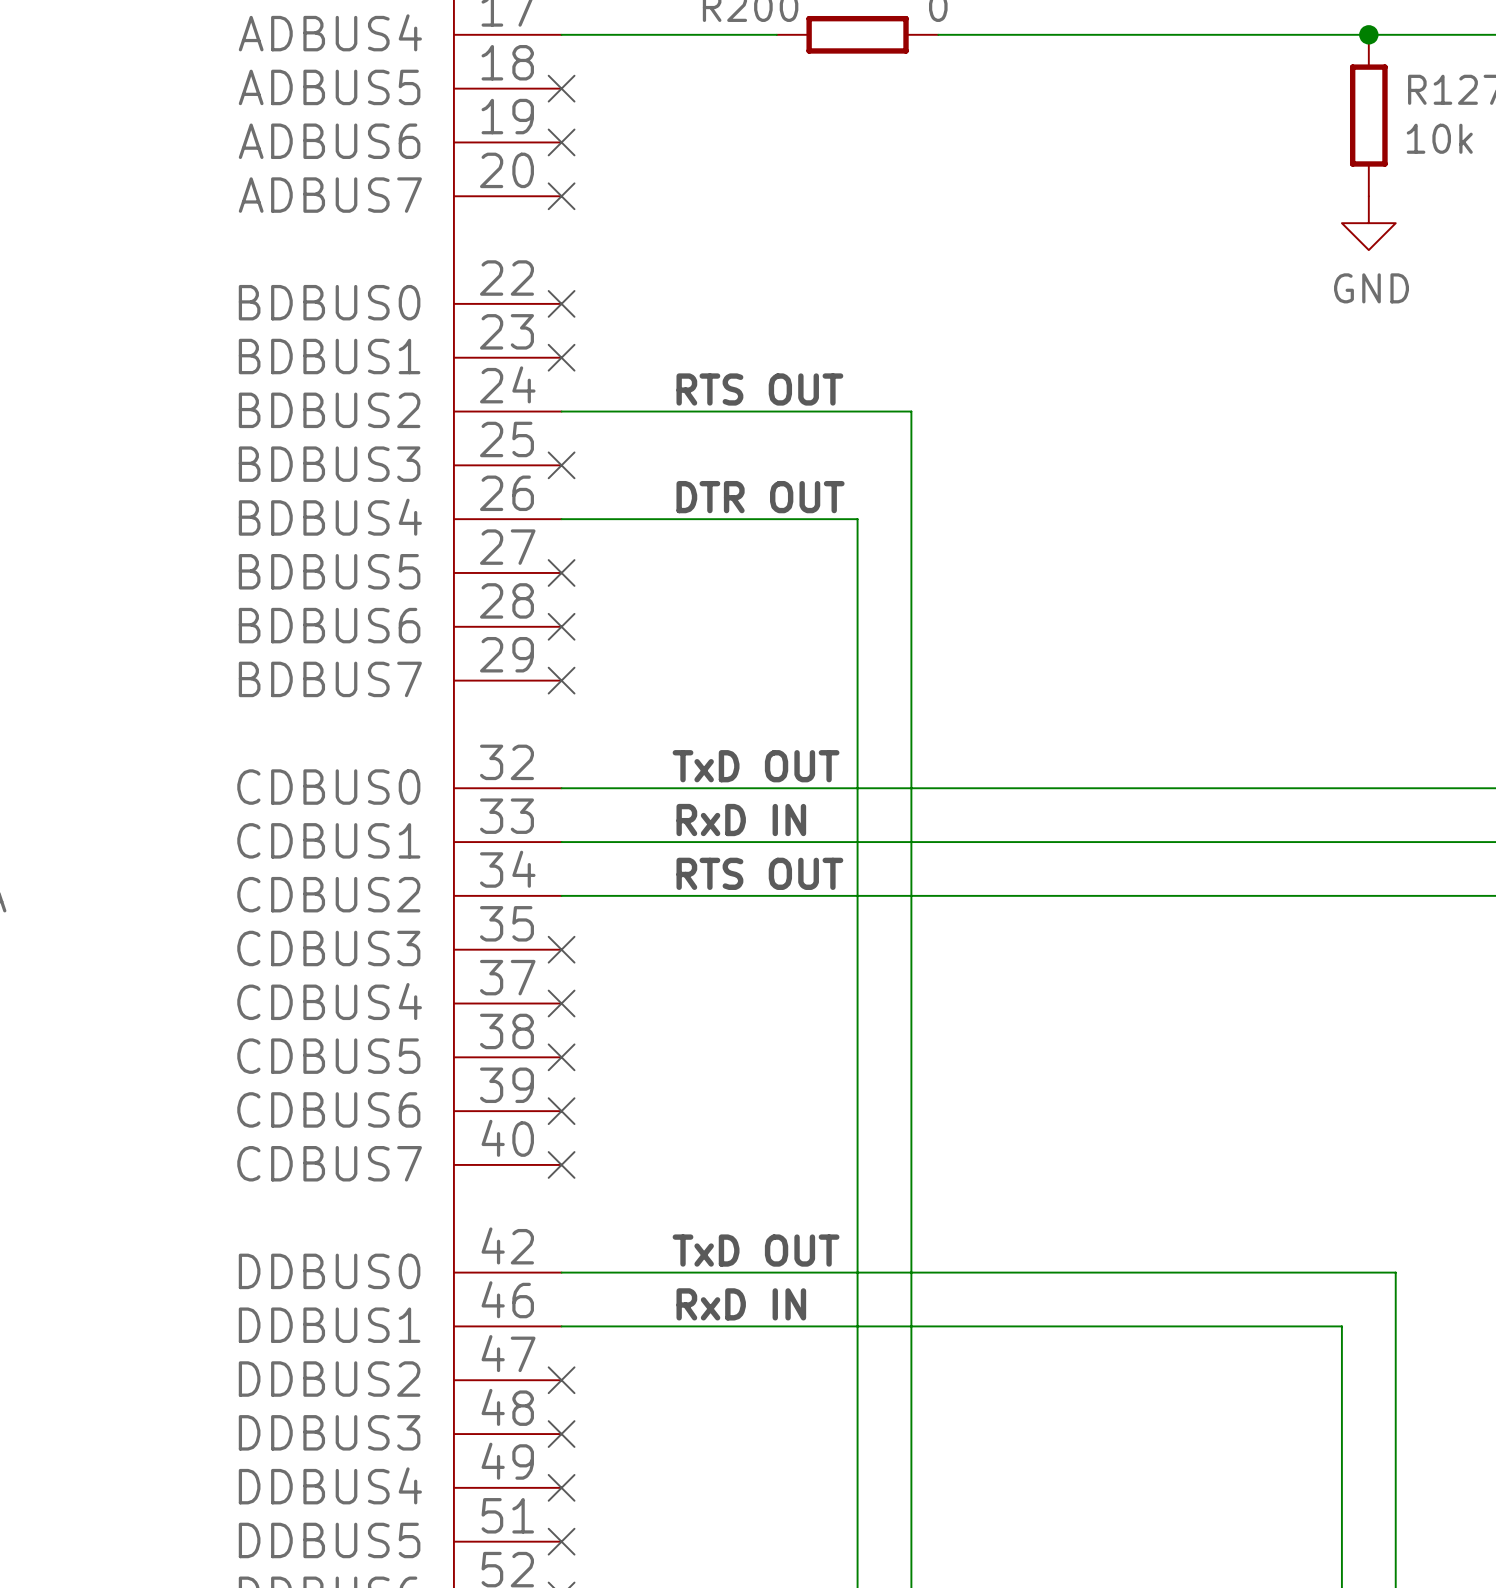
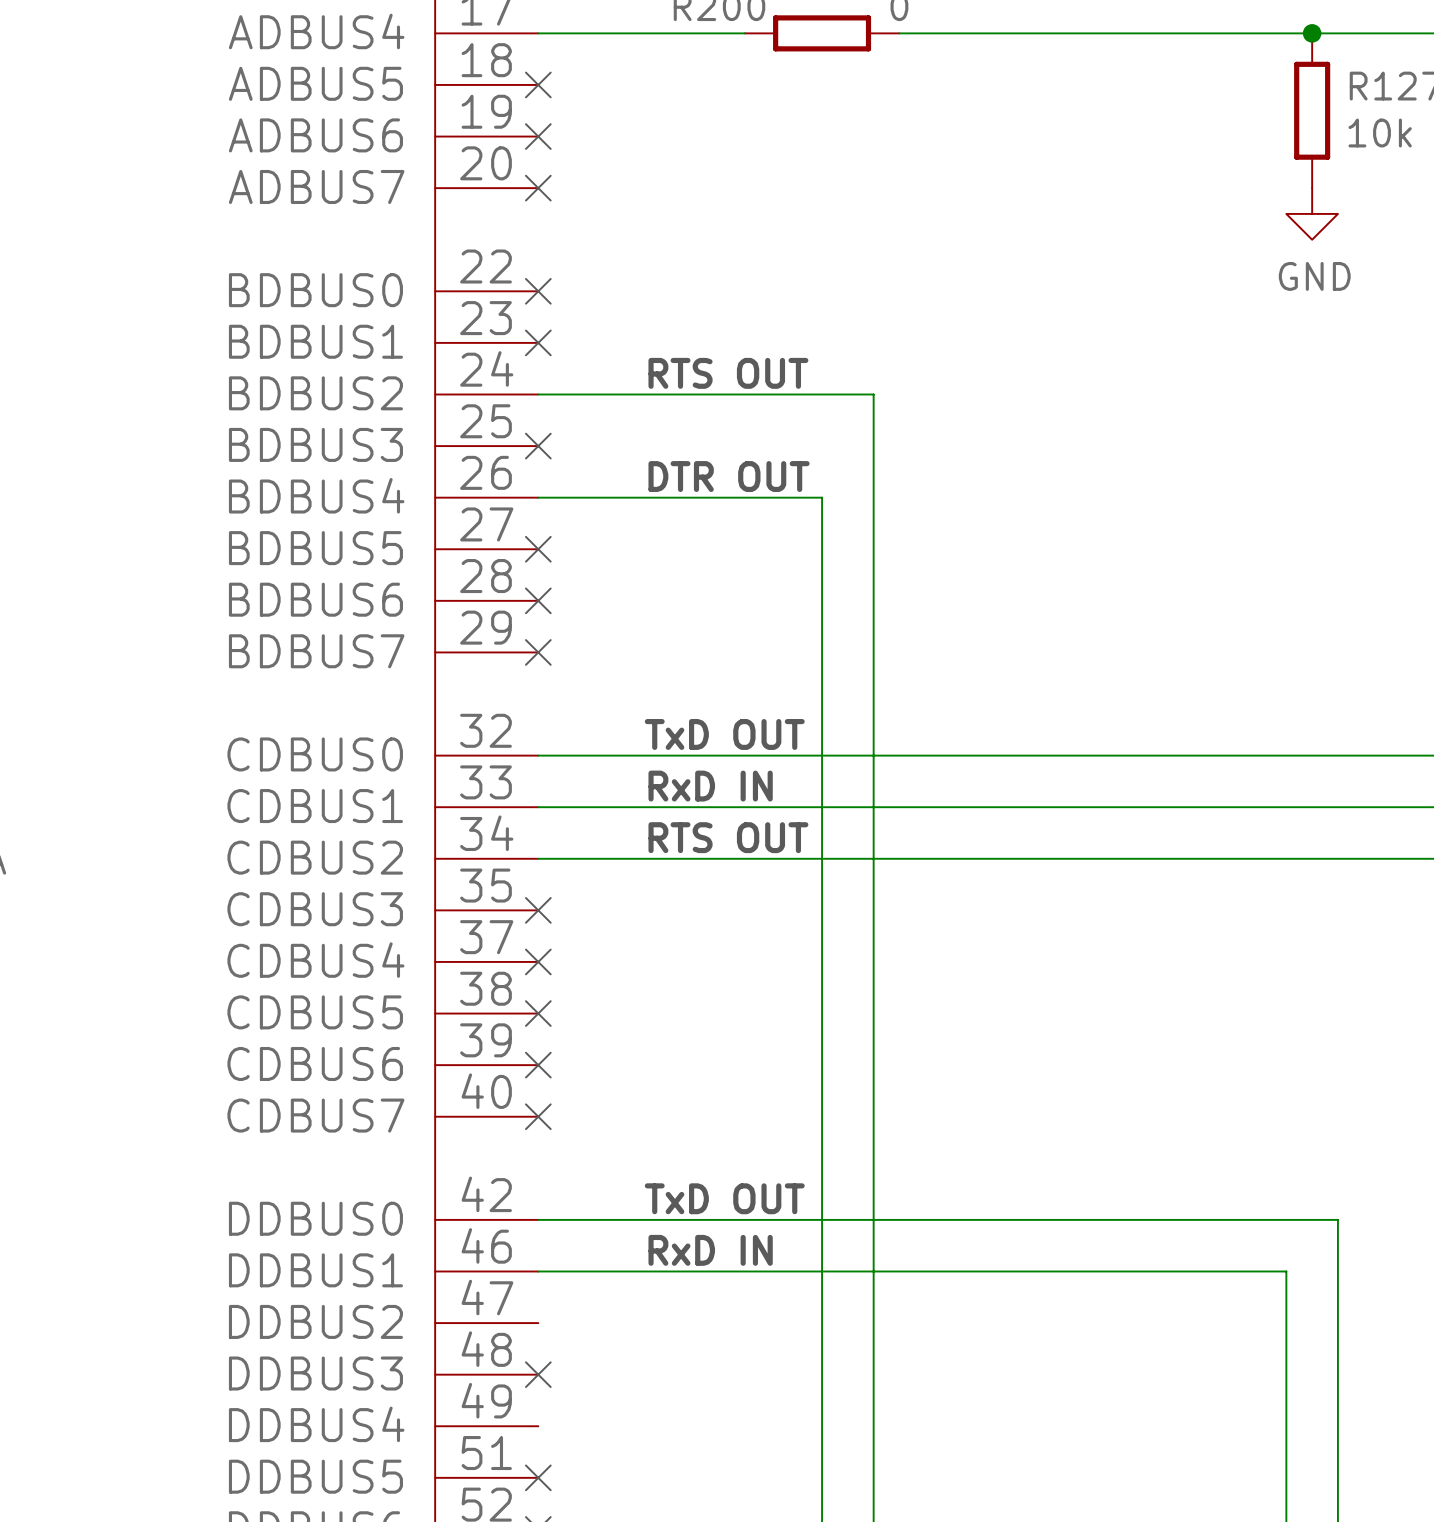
no-connect mark: (561, 1380) -> none
no-connect mark: (561, 1487) -> none

